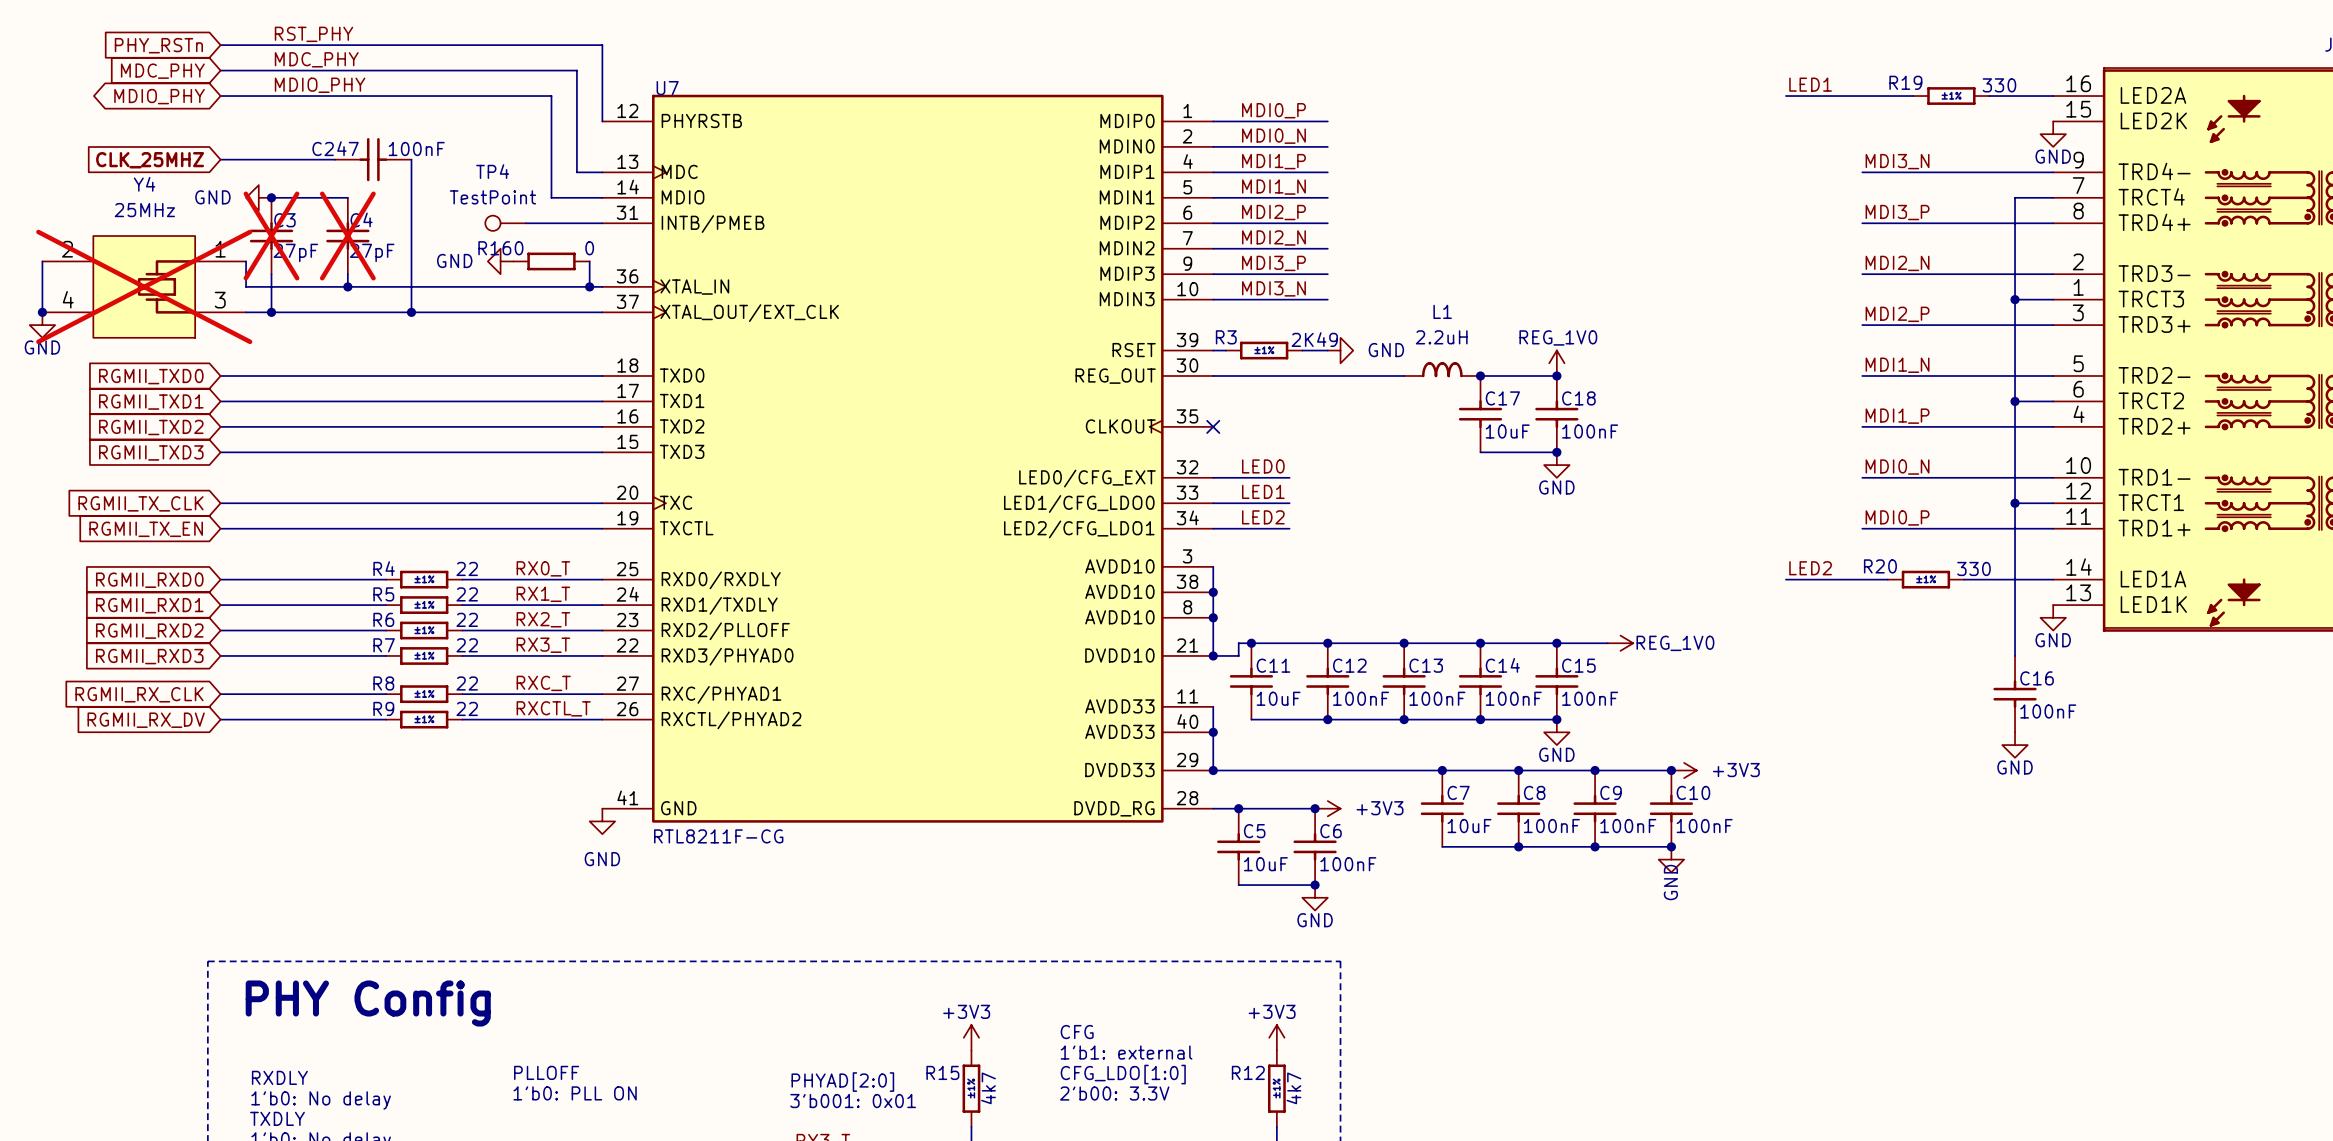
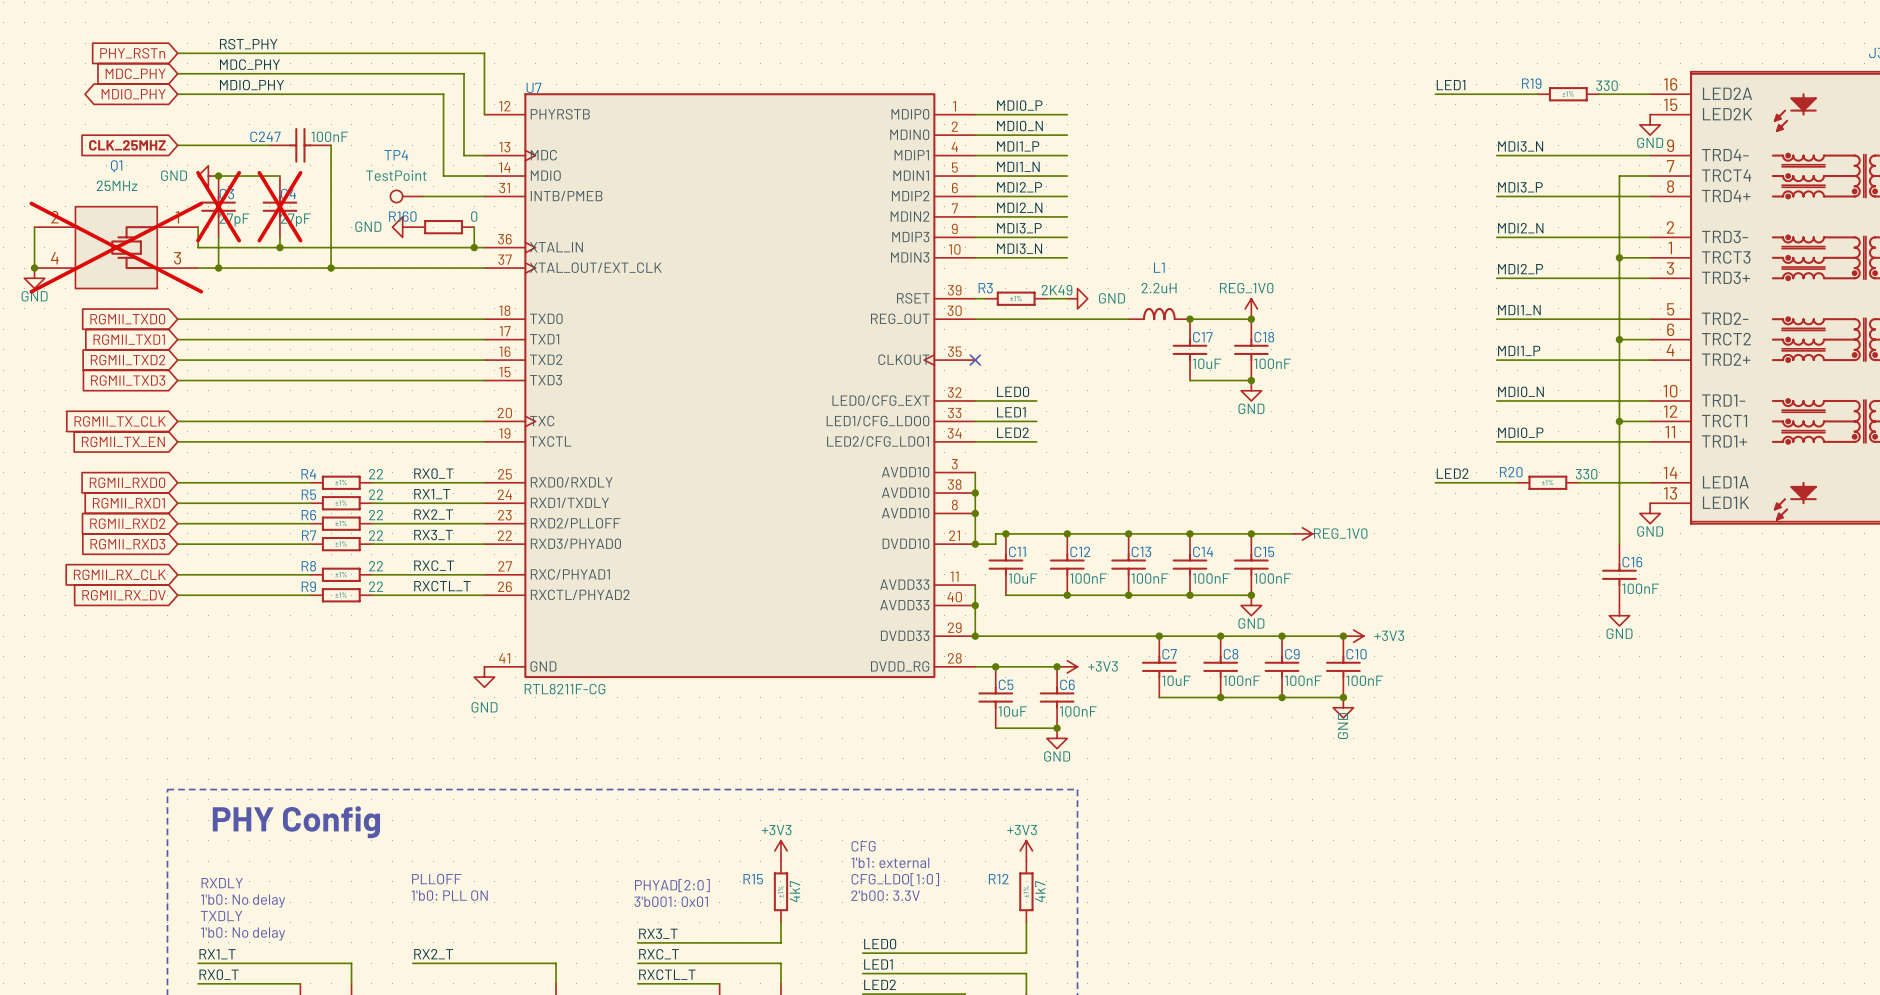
Y4 name: Y4 (144, 184) -> Q1 (116, 166)

